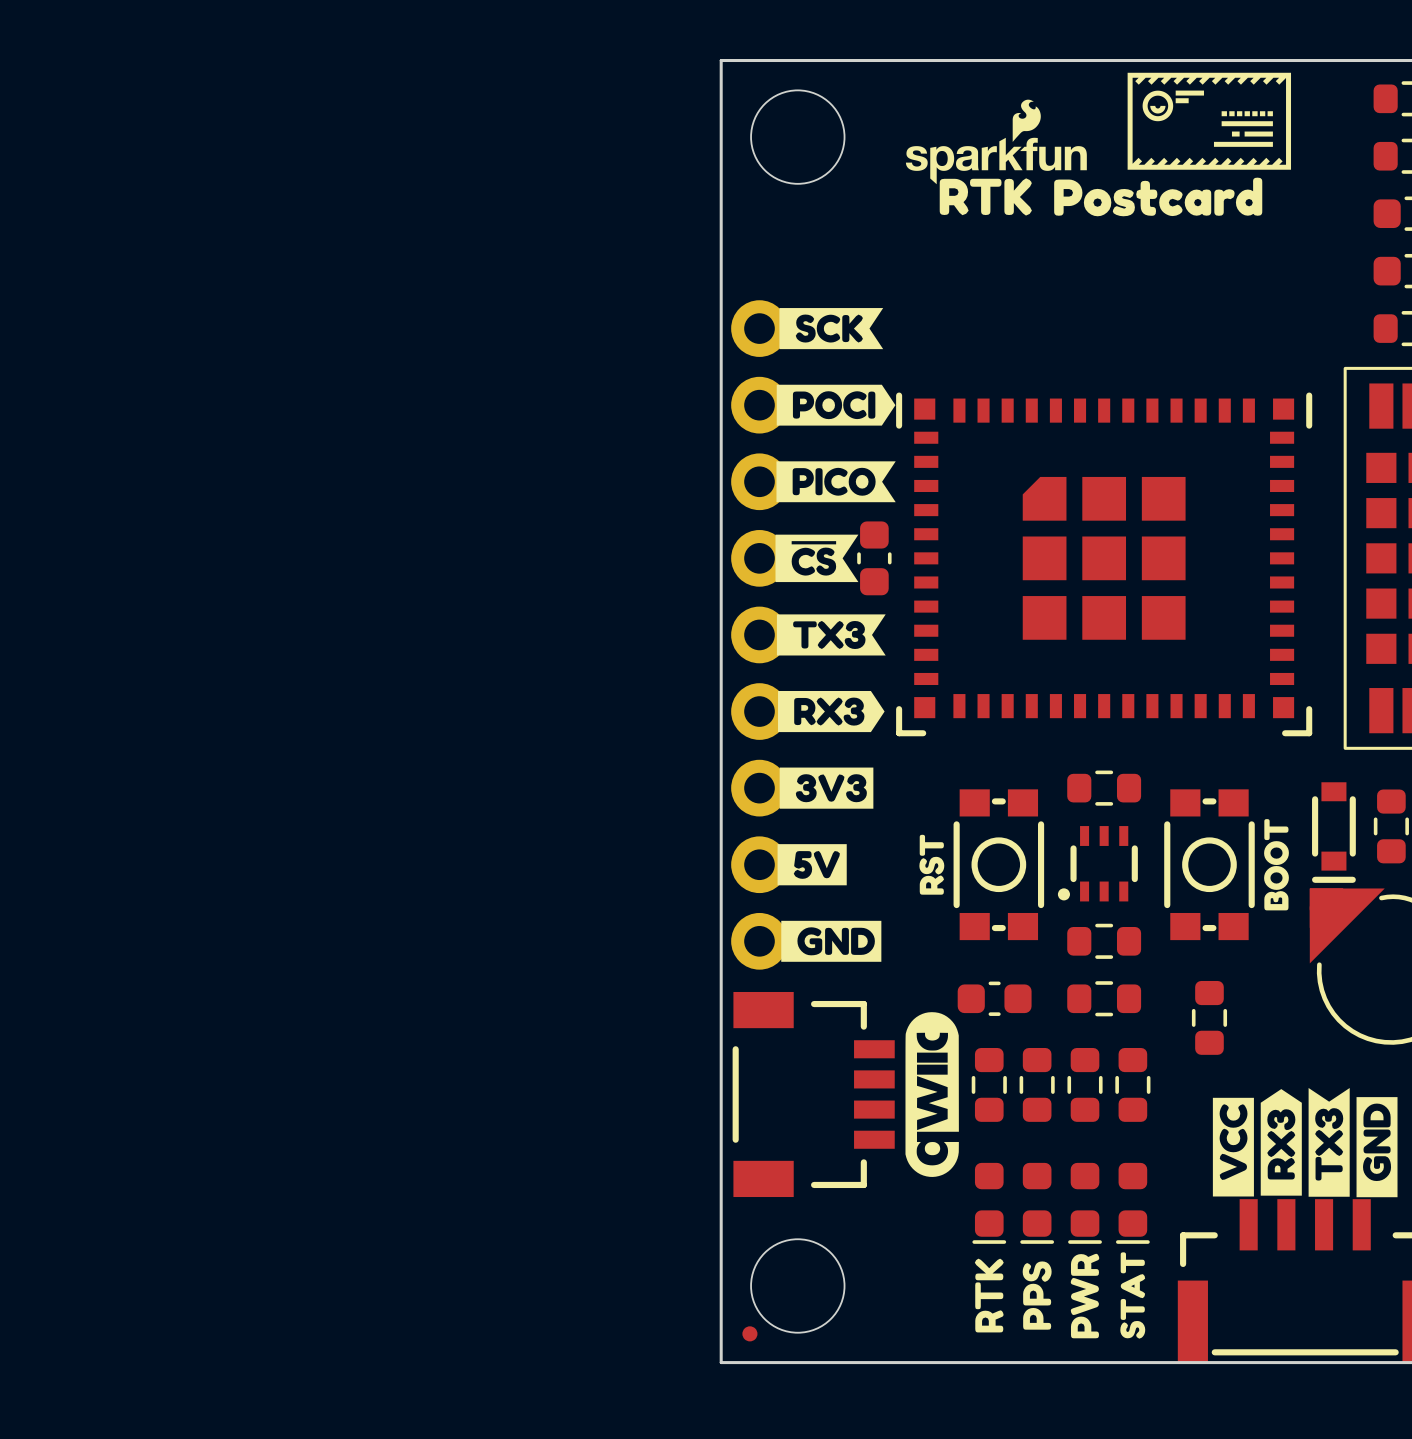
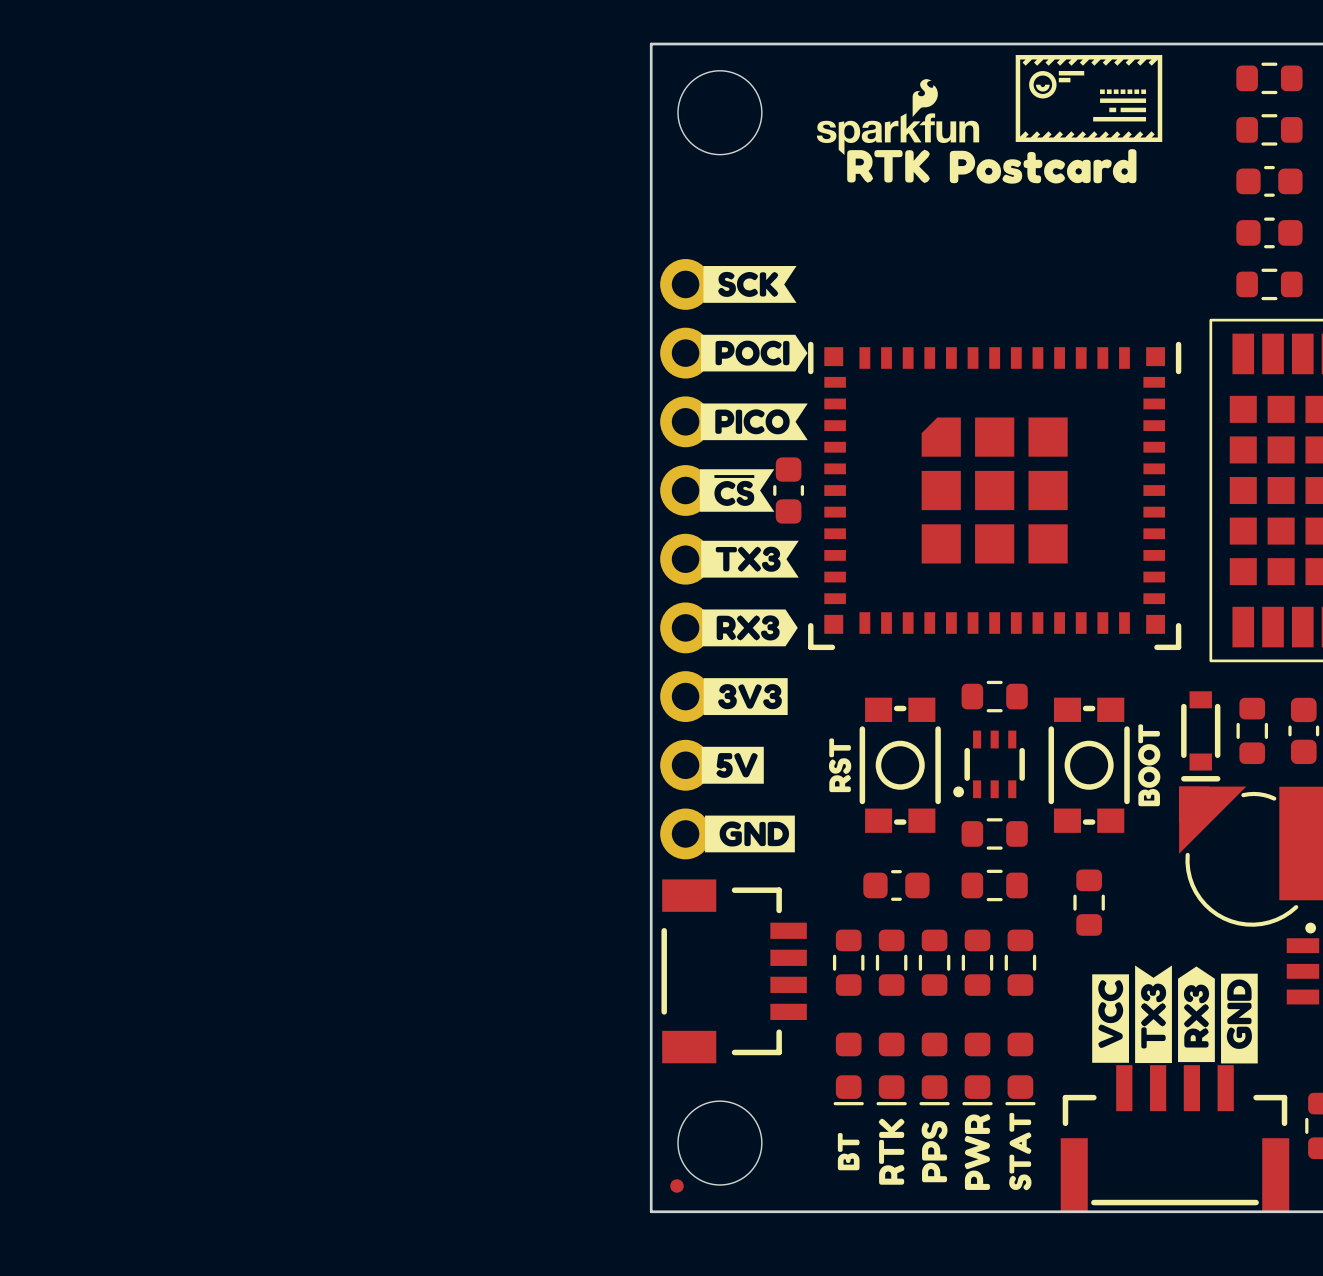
drawing: [905, 1012, 959, 1177] -> none
part: none -> (848, 962)
drawing position: (1281, 1142) -> (1196, 1014)
drawing position: (1329, 1142) -> (1153, 1014)
part: none -> (848, 1068)
drawing: none -> [837, 1133, 860, 1171]

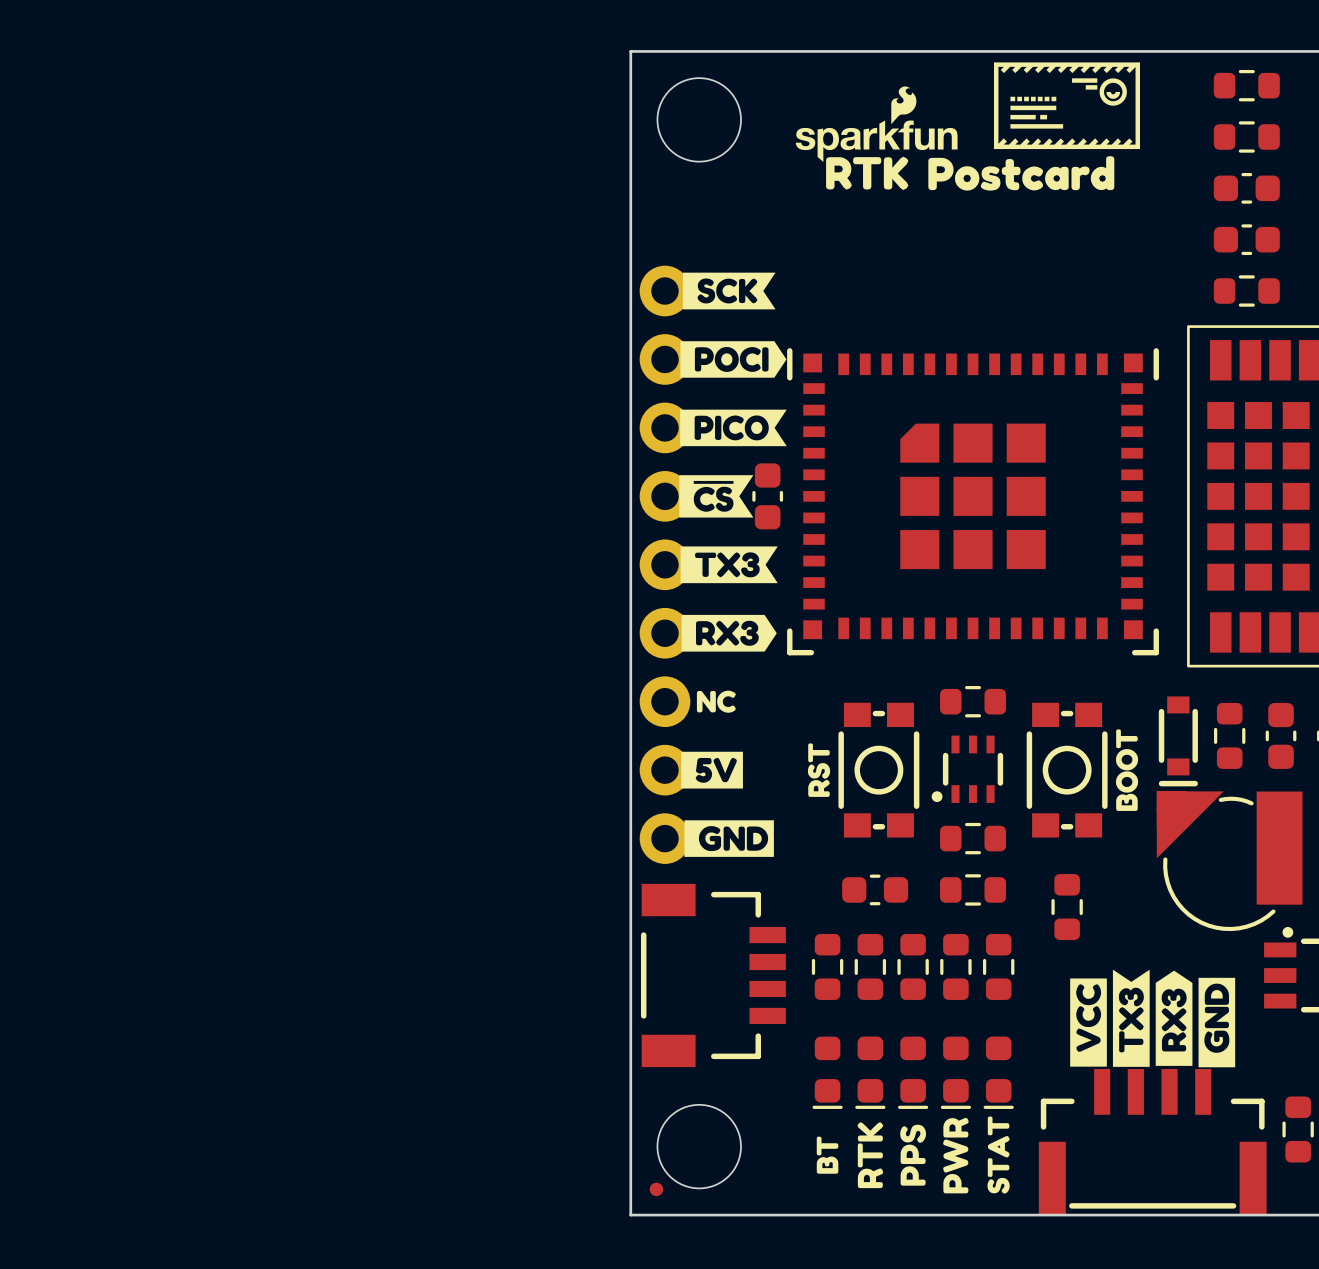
drawing: [1029, 70, 1147, 113] -> none
drawing: none -> [1010, 78, 1127, 120]
drawing position: (1064, 80) -> (1091, 87)
drawing position: (1042, 88) -> (1113, 95)
drawing position: (1123, 100) -> (1033, 107)
drawing position: (1112, 109) -> (1043, 117)
drawing position: (1119, 119) -> (1036, 126)
drawing shape: [703, 678, 788, 716] -> [696, 690, 736, 713]

